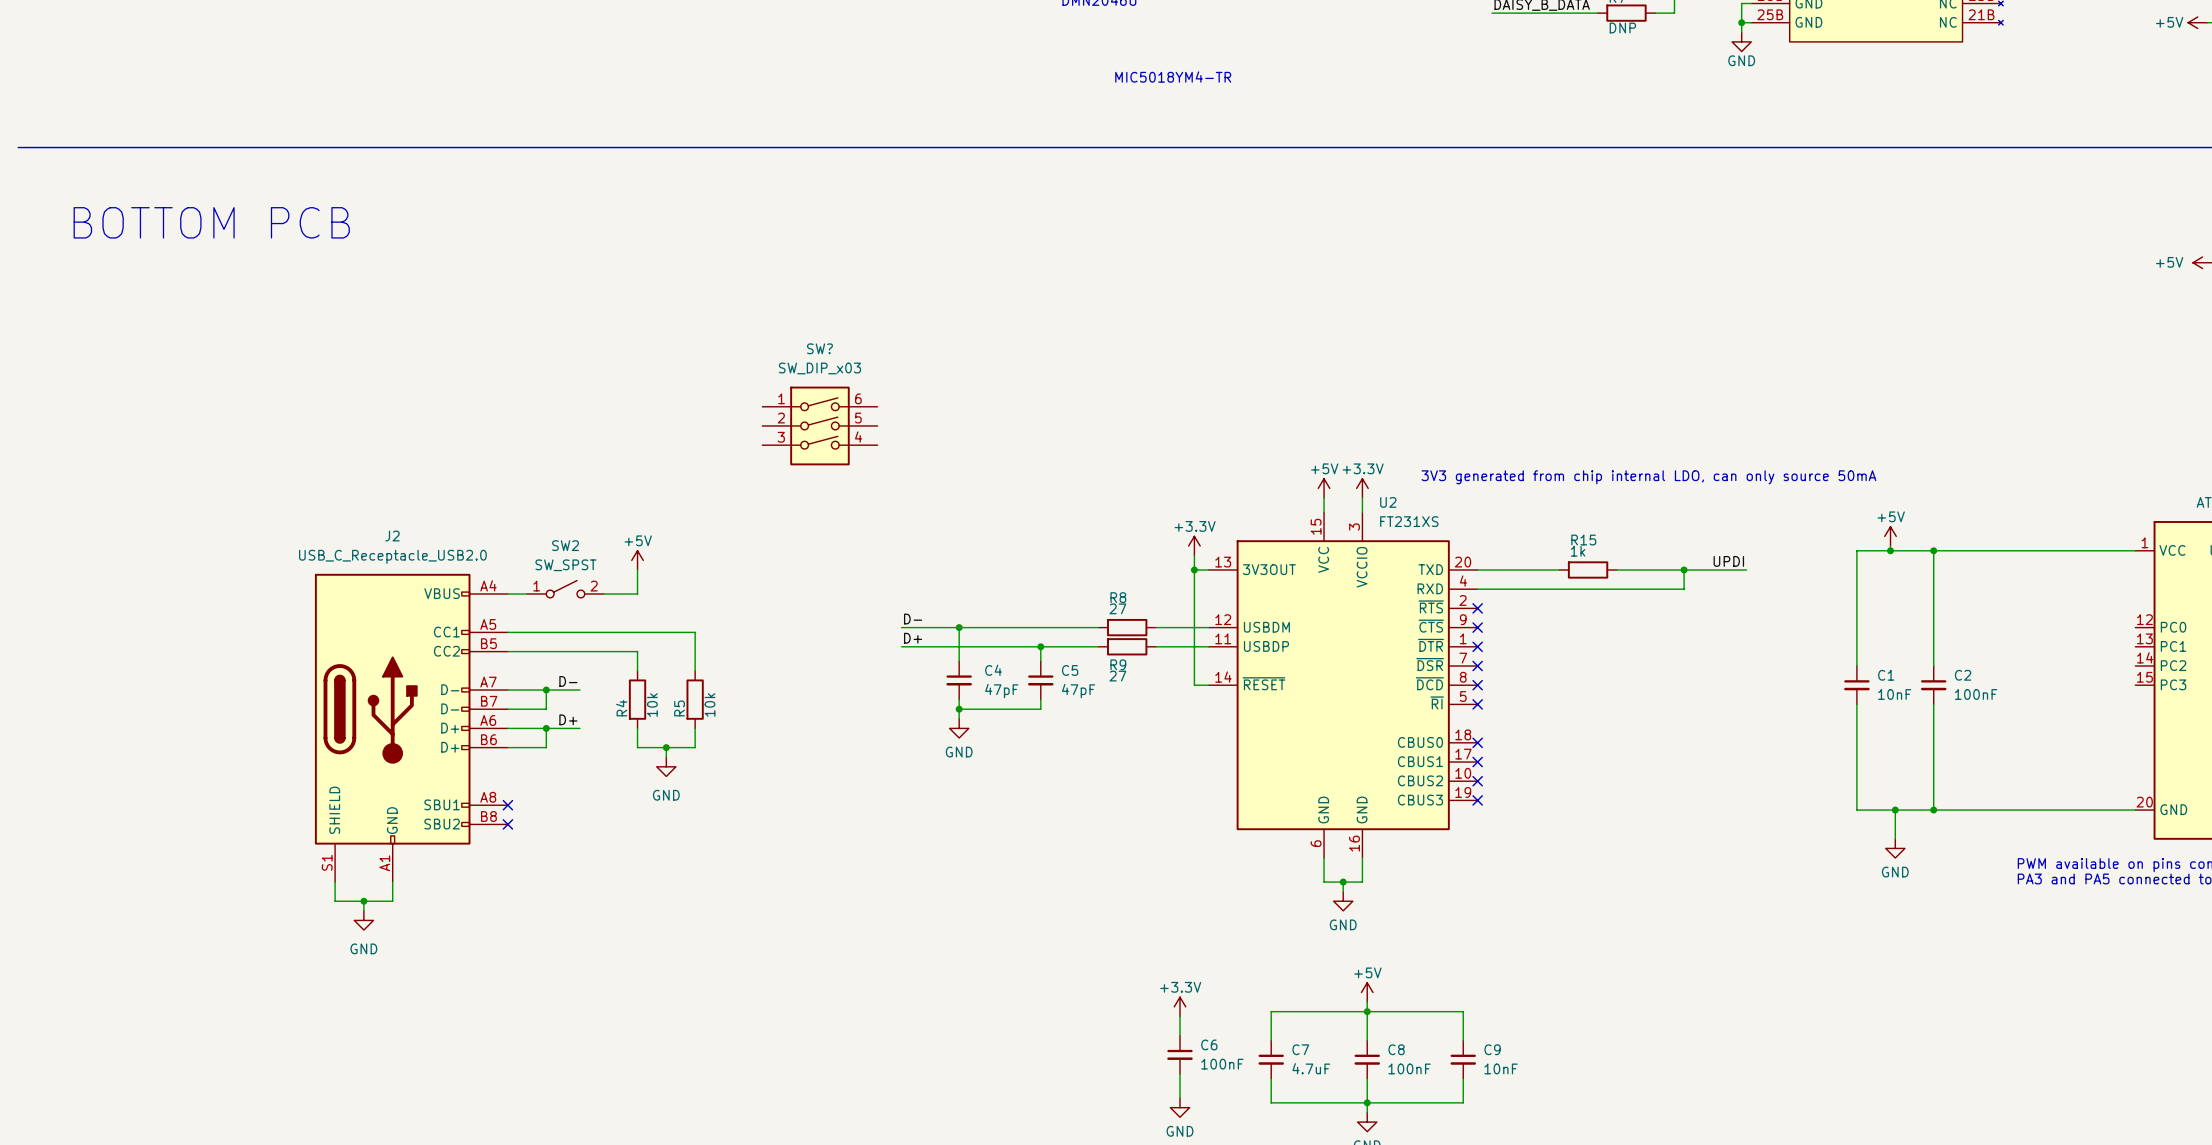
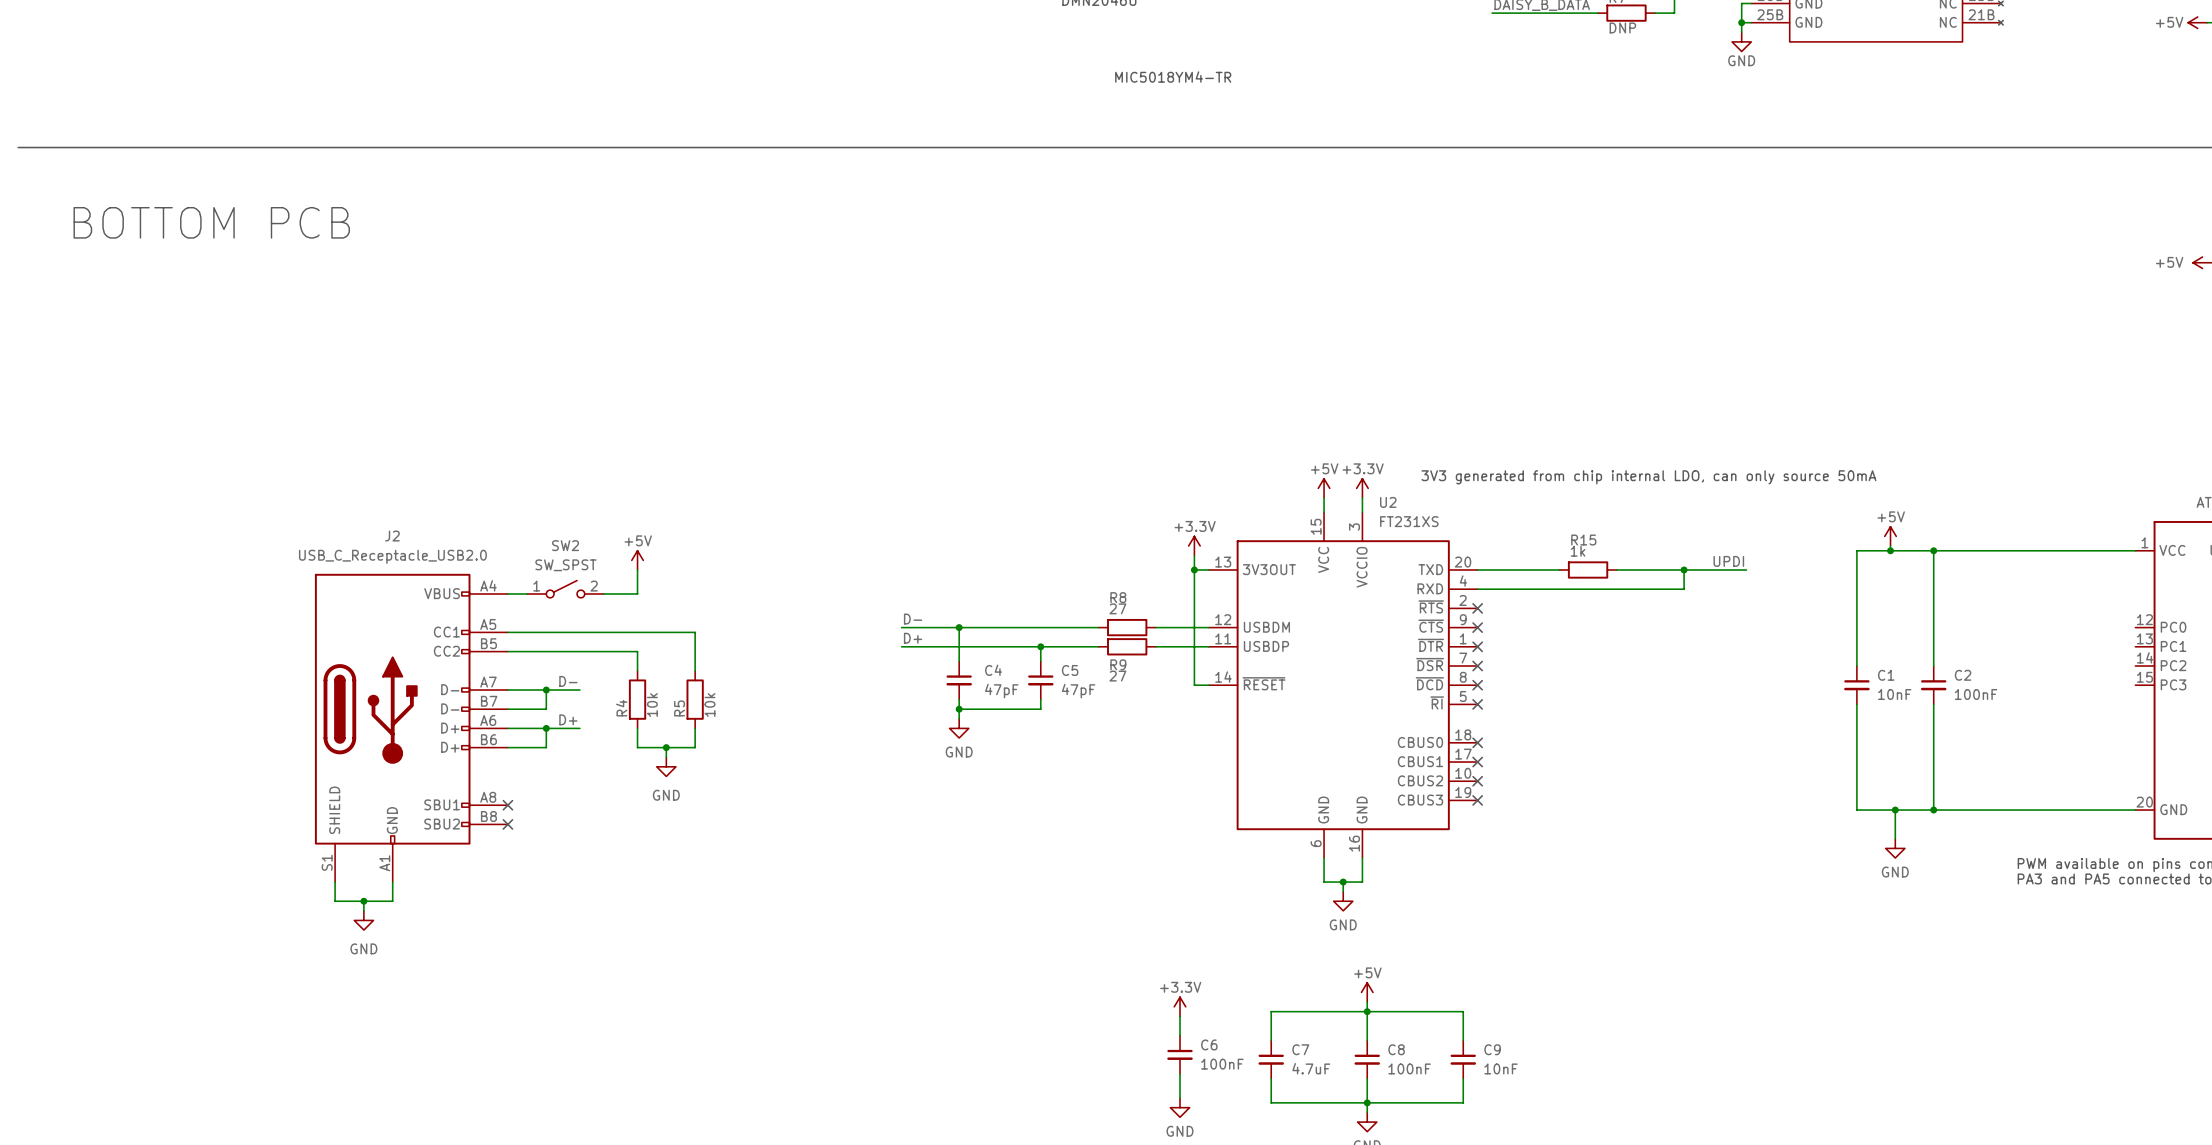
SW?: SW_DIP_x03 (819, 425) -> none

